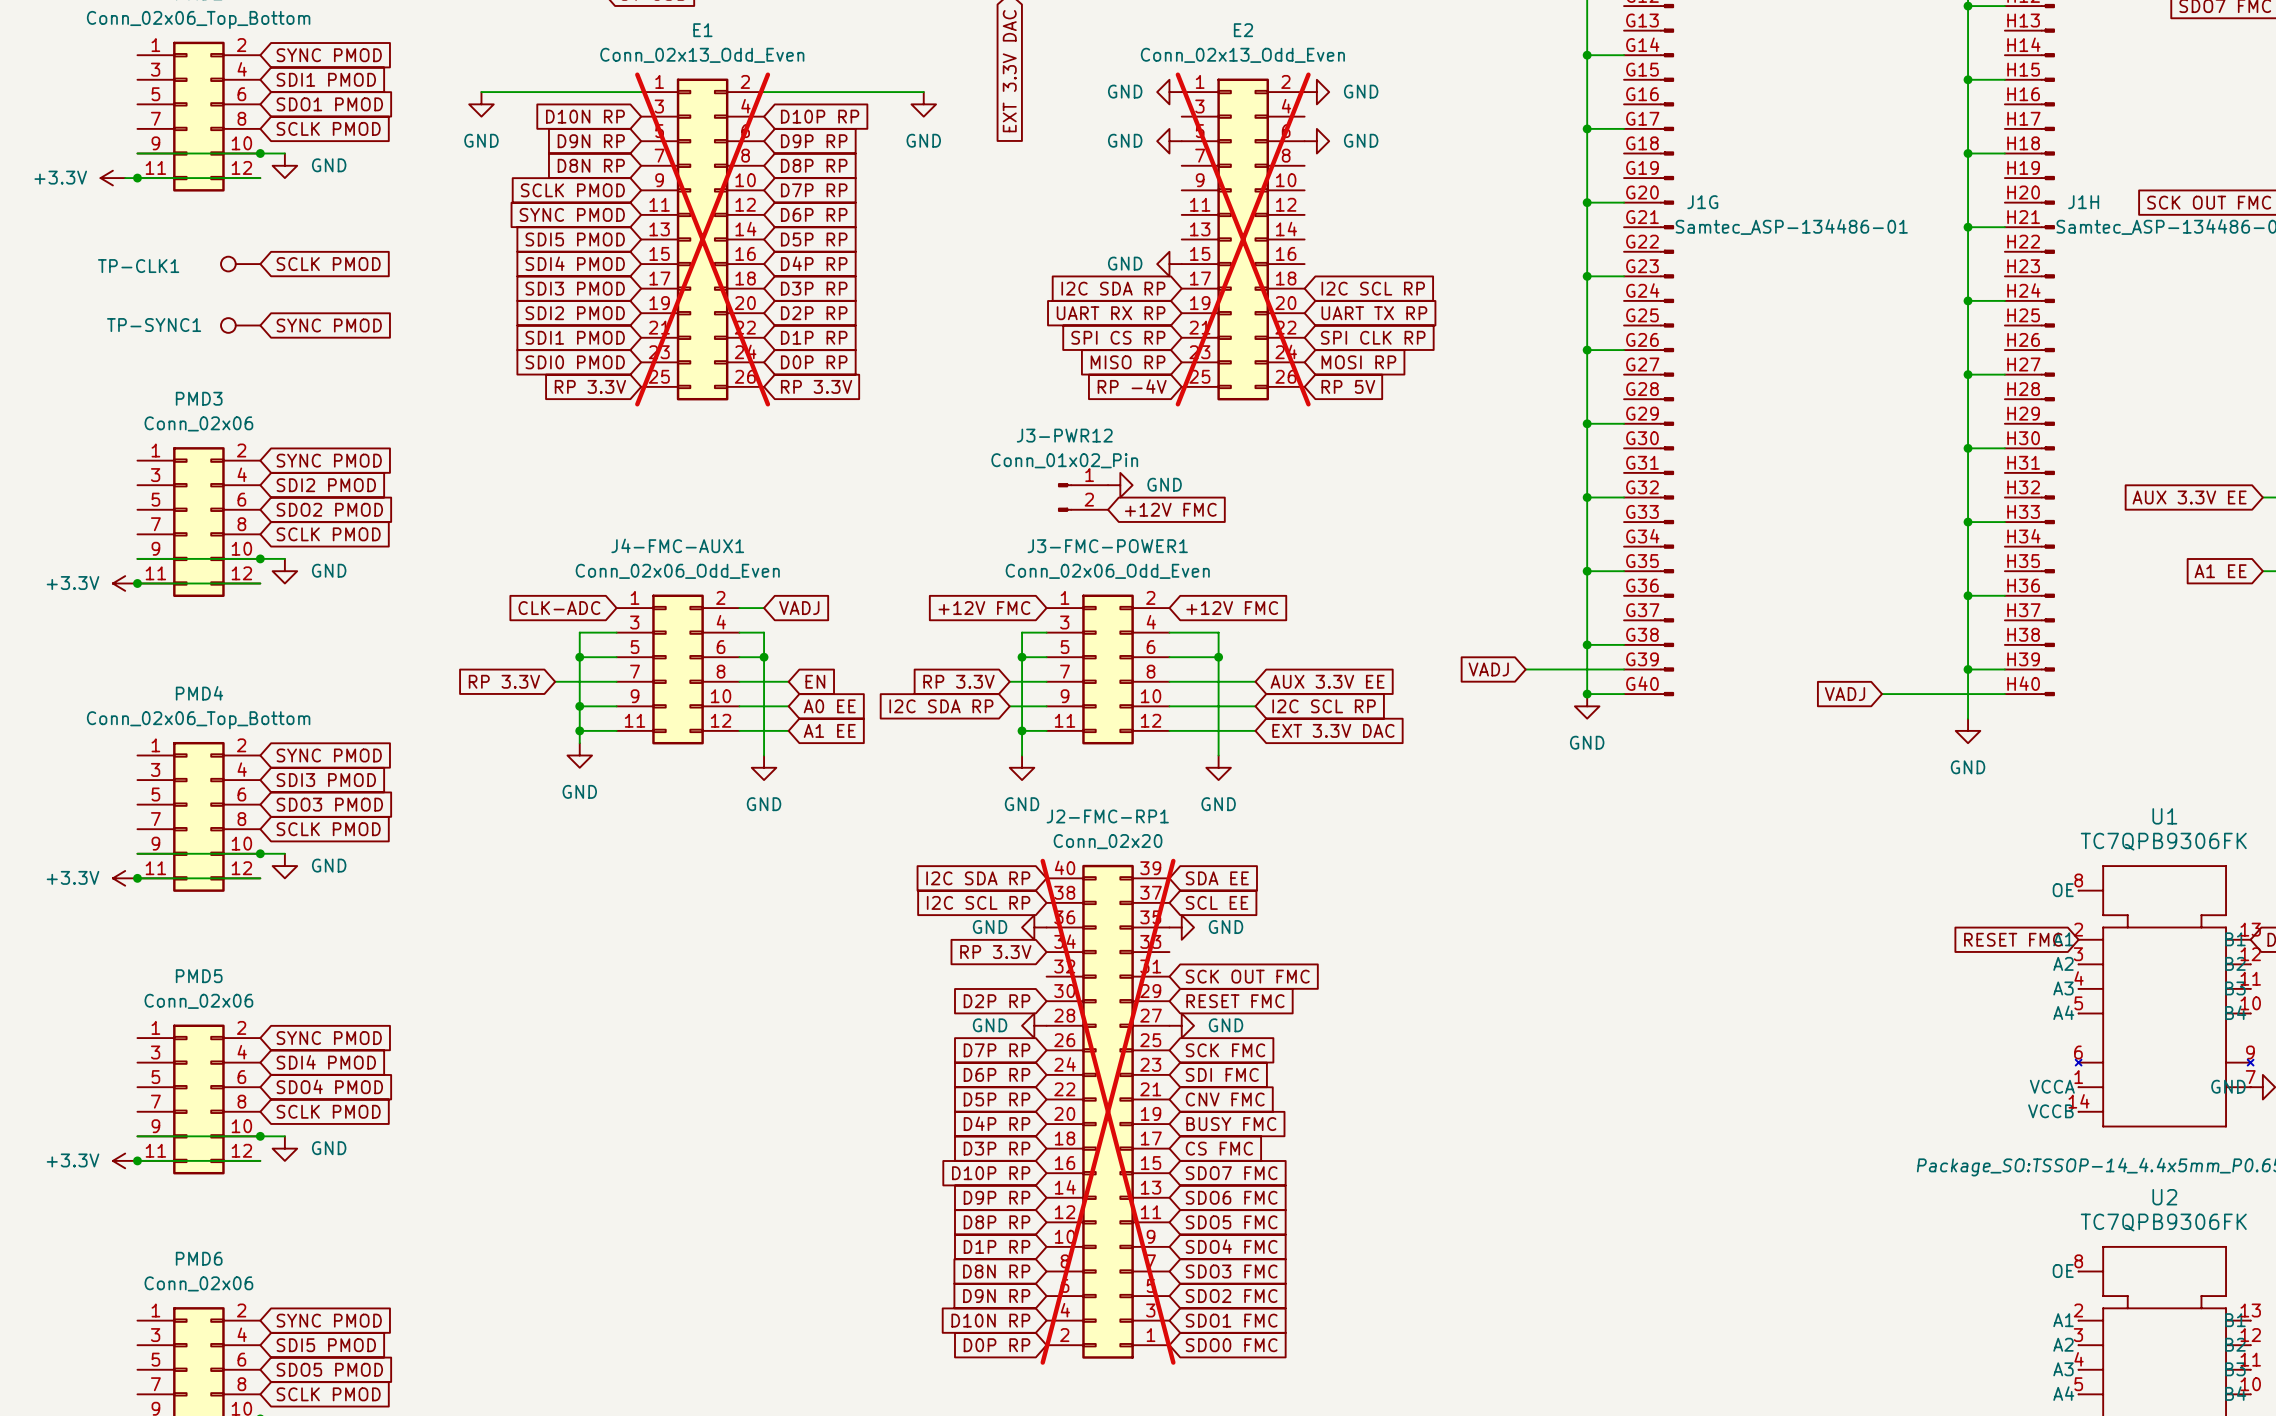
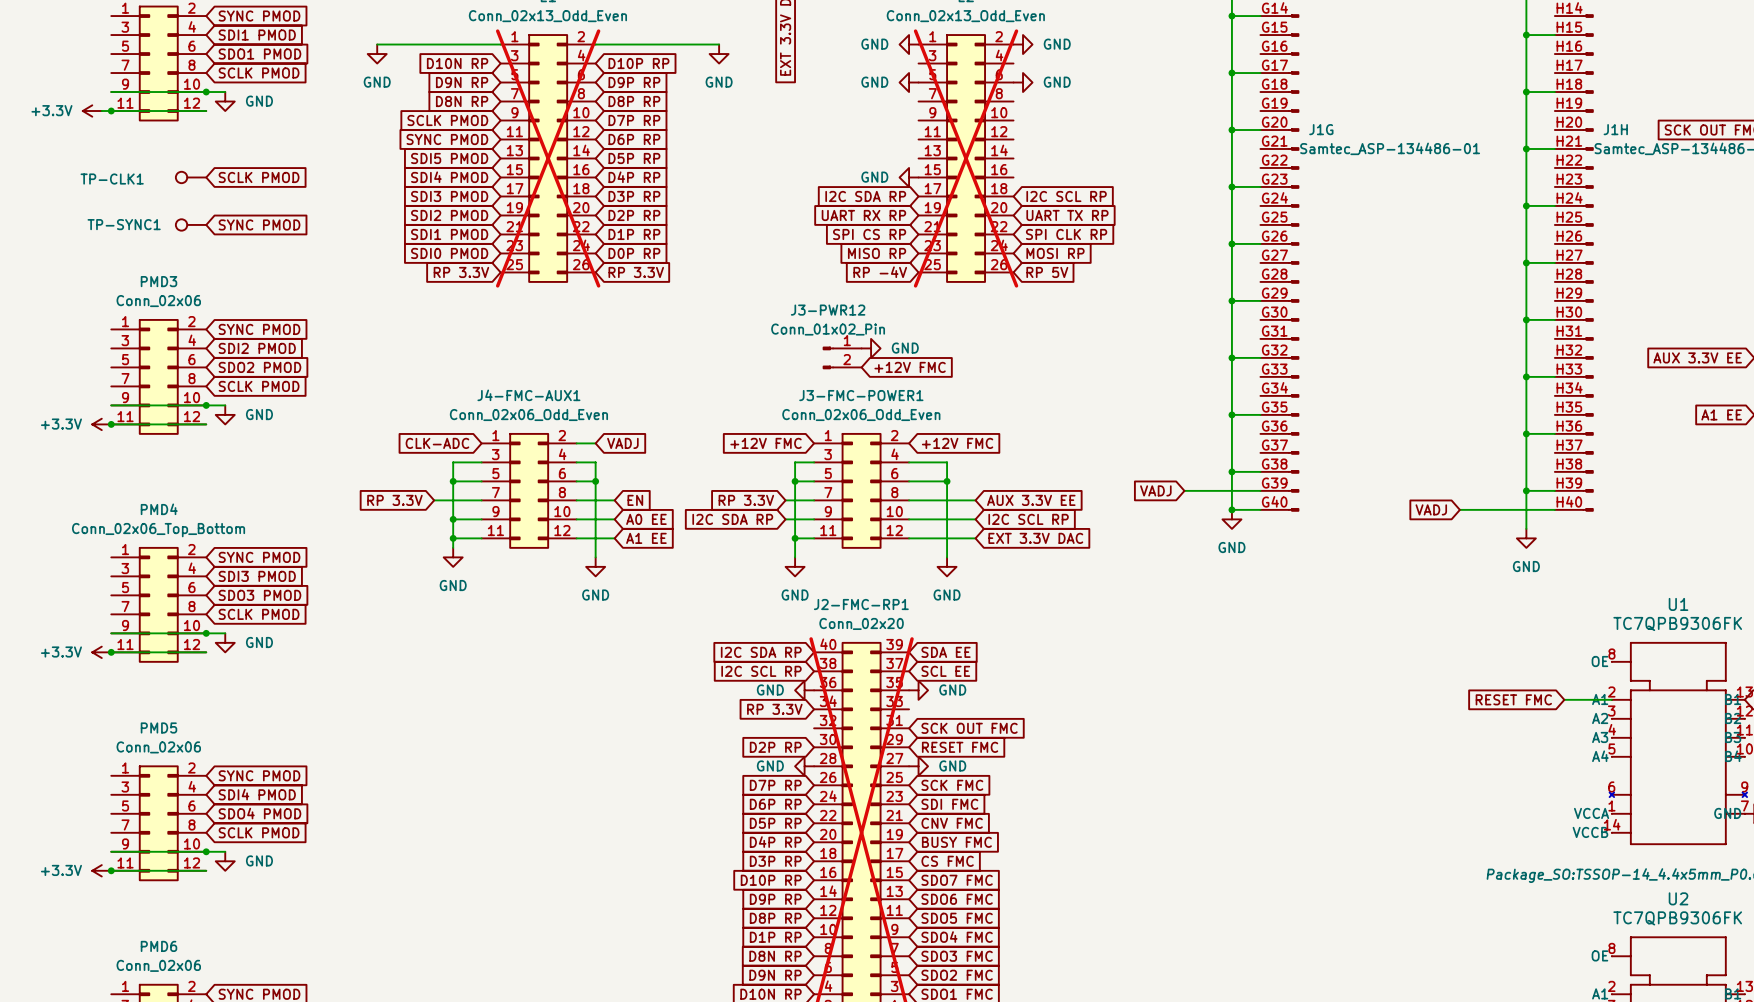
global label position: RESET FMC (2013, 939) -> RESET FMC (1513, 699)
wire: none -> (1564, 699) (1611, 699)

